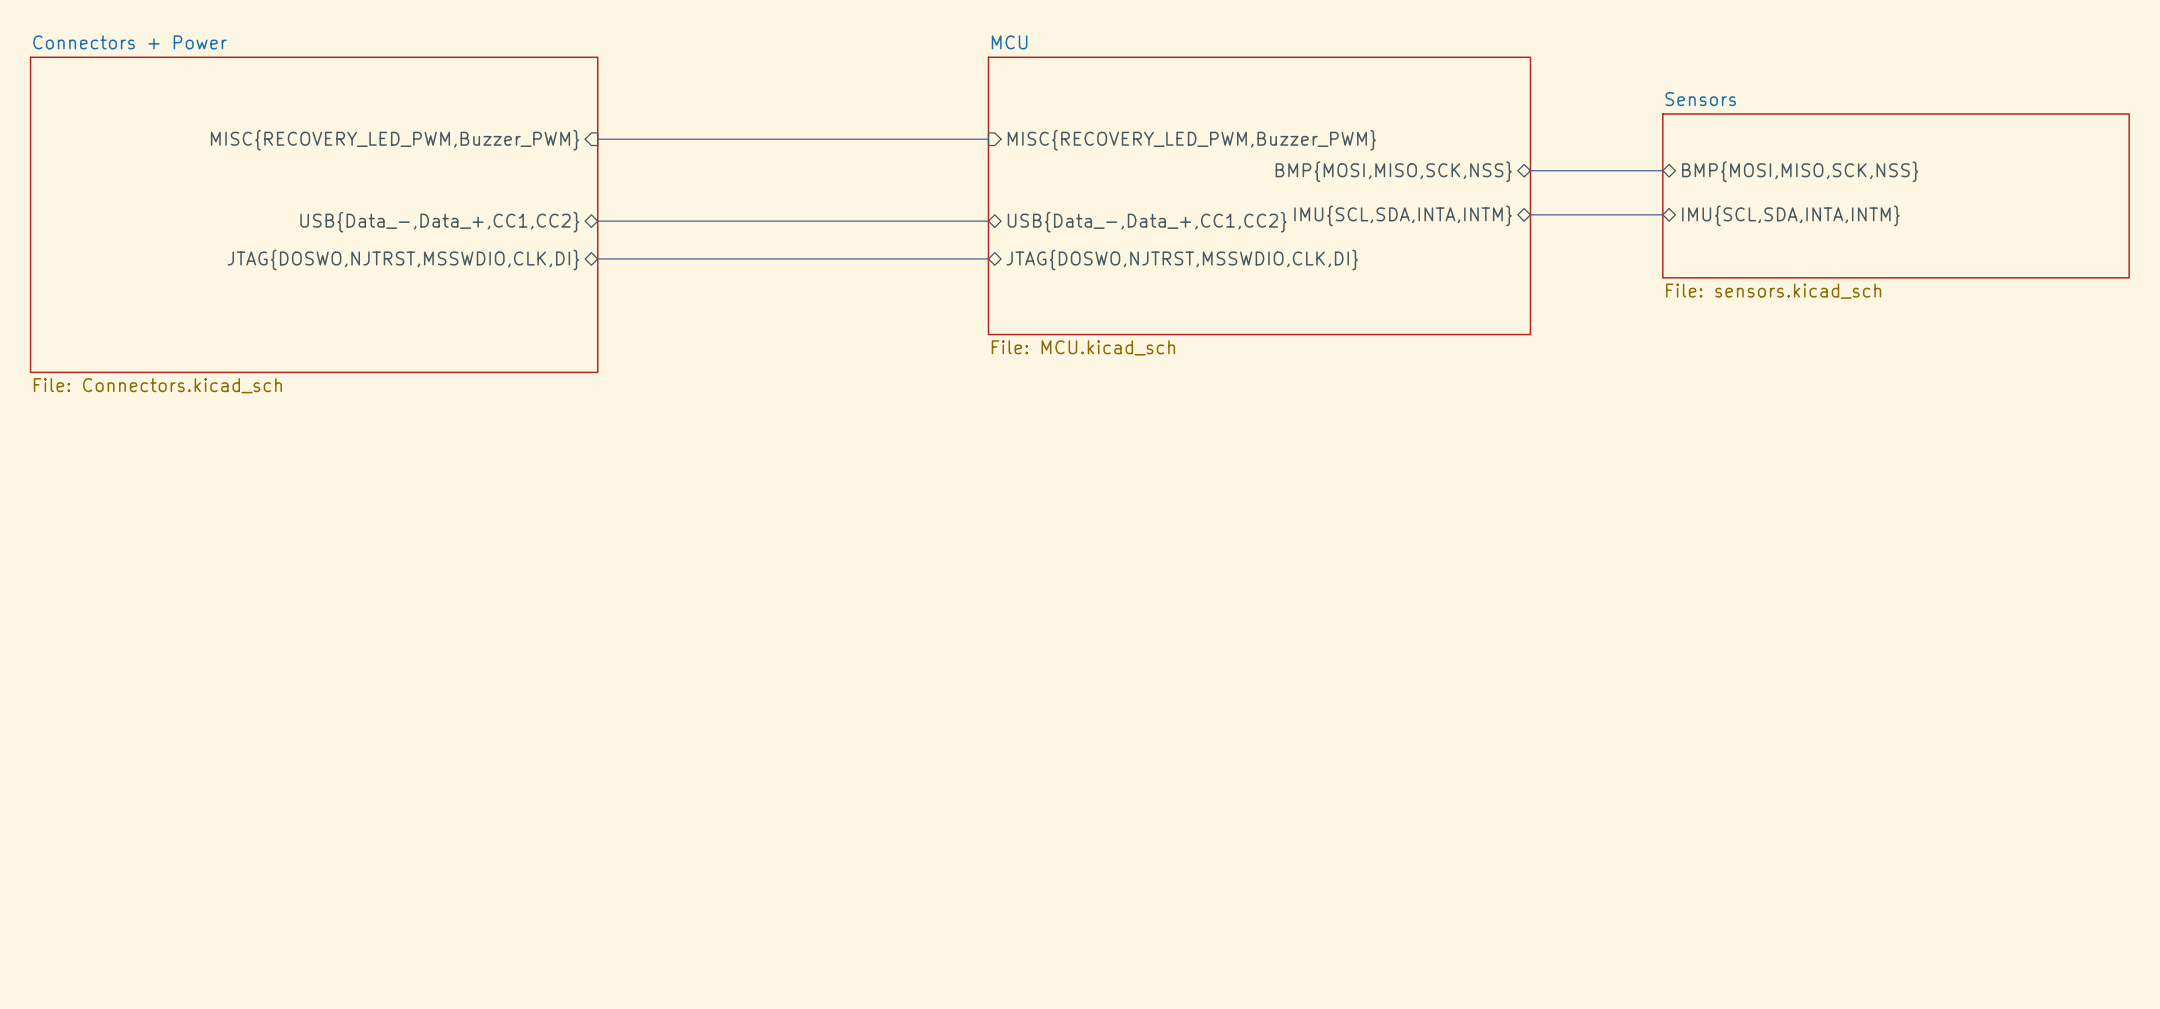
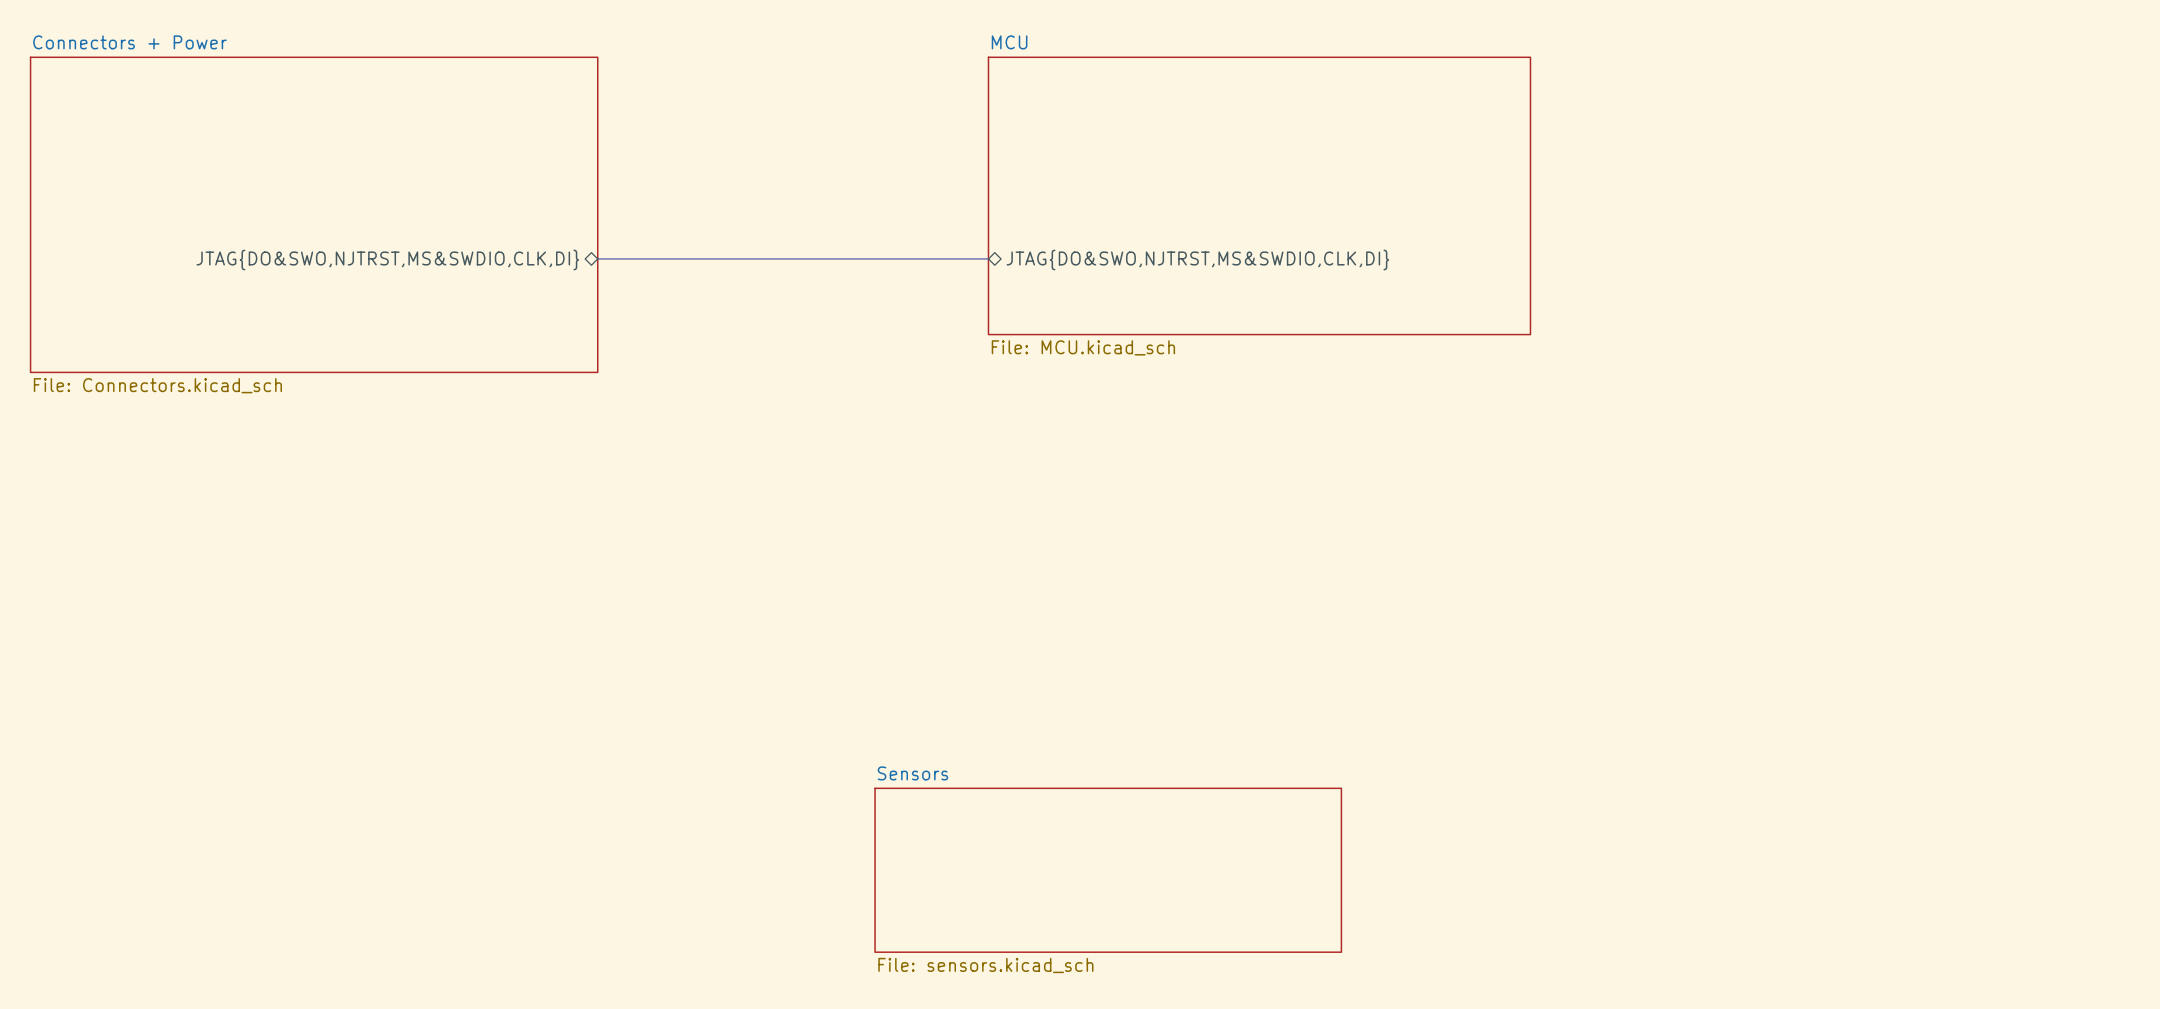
bus: (597, 139) (988, 139) -> none
sheet pin: MISC{RECOVERY_LED_PWM,Buzzer_PWM} (394, 140) -> none
sheet pin: MISC{RECOVERY_LED_PWM,Buzzer_PWM} (1191, 140) -> none
bus: (1530, 170) (1662, 170) -> none
sheet pin: BMP{MOSI,MISO,SCK,NSS} (1393, 171) -> none
sheet pin: BMP{MOSI,MISO,SCK,NSS} (1800, 171) -> none
sheet Sensors: File: sensors.kicad_sch (1895, 195) -> none
bus: (1530, 214) (1662, 214) -> none
sheet pin: IMU{SCL,SDA,INTA,INTM} (1403, 215) -> none
sheet pin: IMU{SCL,SDA,INTA,INTM} (1790, 215) -> none
bus: (597, 221) (988, 221) -> none
sheet pin: USB{Data_-,Data_+,CC1,CC2} (439, 222) -> none
sheet pin: USB{Data_-,Data_+,CC1,CC2} (1147, 222) -> none
sheet pin: JTAG{DOSWO,NJTRST,MSSWDIO,CLK,DI} (403, 259) -> JTAG{DO&SWO,NJTRST,MS&SWDIO,CLK,DI} (387, 259)
sheet pin: JTAG{DOSWO,NJTRST,MSSWDIO,CLK,DI} (1182, 259) -> JTAG{DO&SWO,NJTRST,MS&SWDIO,CLK,DI} (1197, 259)
sheet Sensors: none -> File: sensors.kicad_sch (1108, 870)

